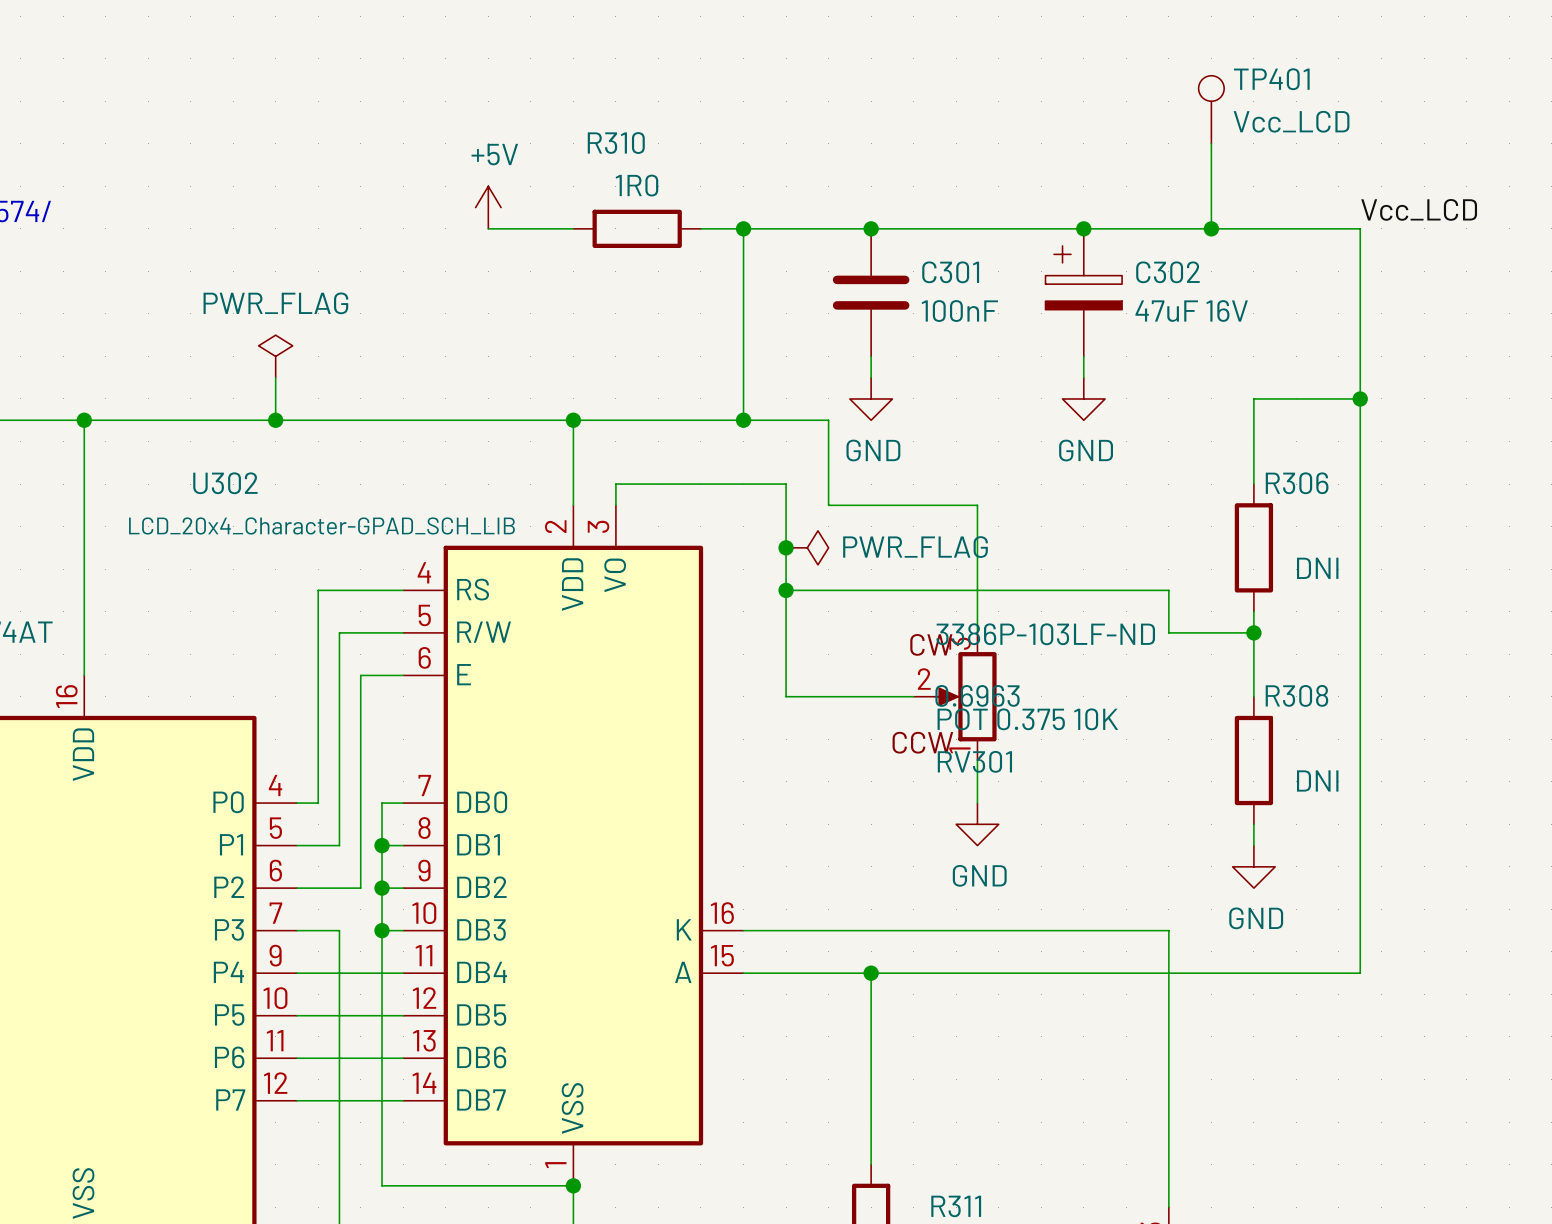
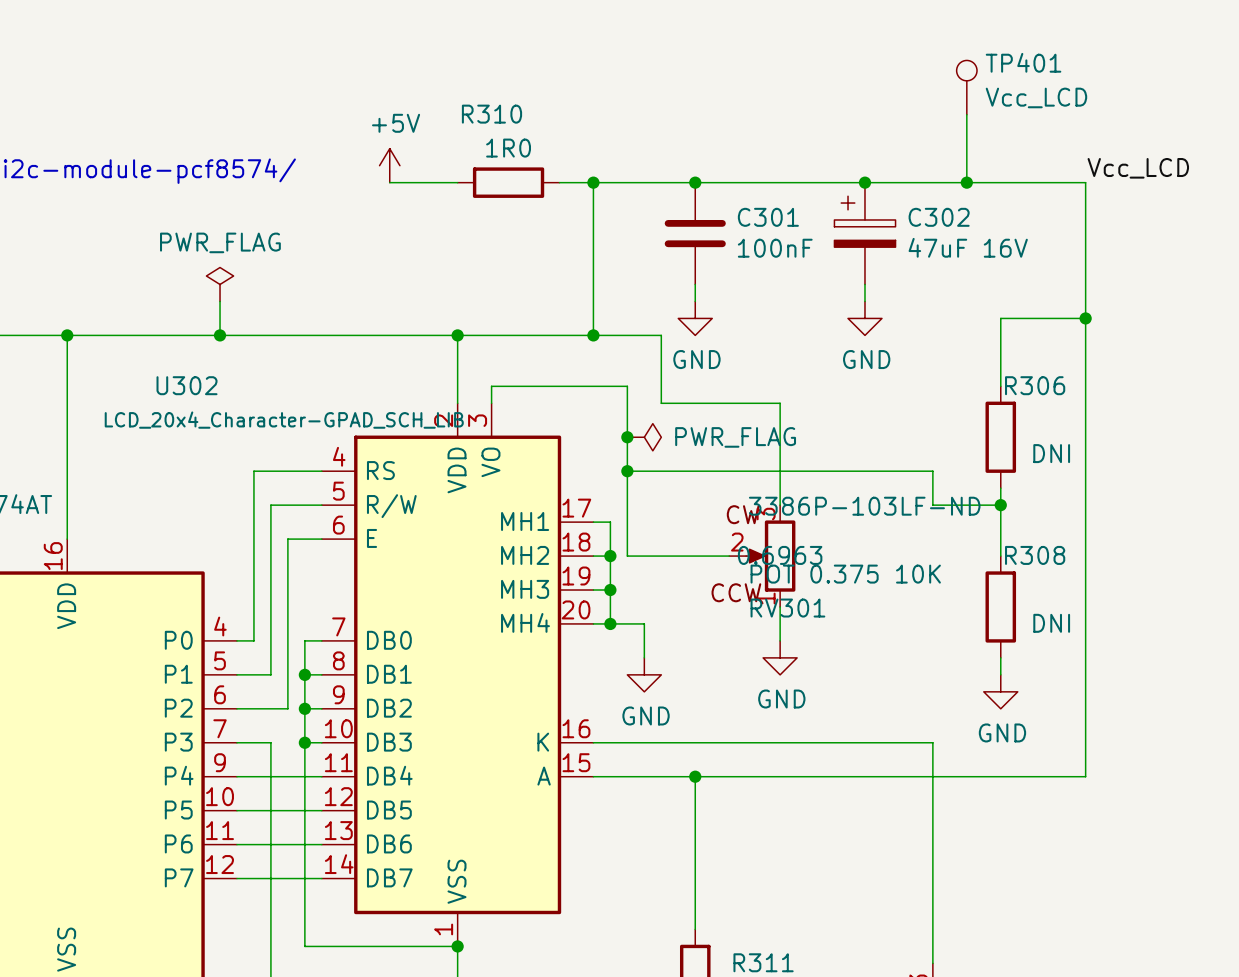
U302 symbol: [403, 505, 744, 1186] -> [321, 403, 594, 947]
wire: none -> (593, 522) (610, 522) (610, 623)
wire: none -> (593, 556) (610, 556)
junction: none -> (610, 556)
wire: none -> (593, 590) (610, 590)
junction: none -> (610, 590)
wire: none -> (593, 623) (644, 623) (644, 657)
junction: none -> (610, 623)
power symbol: none -> GND (644, 674)

